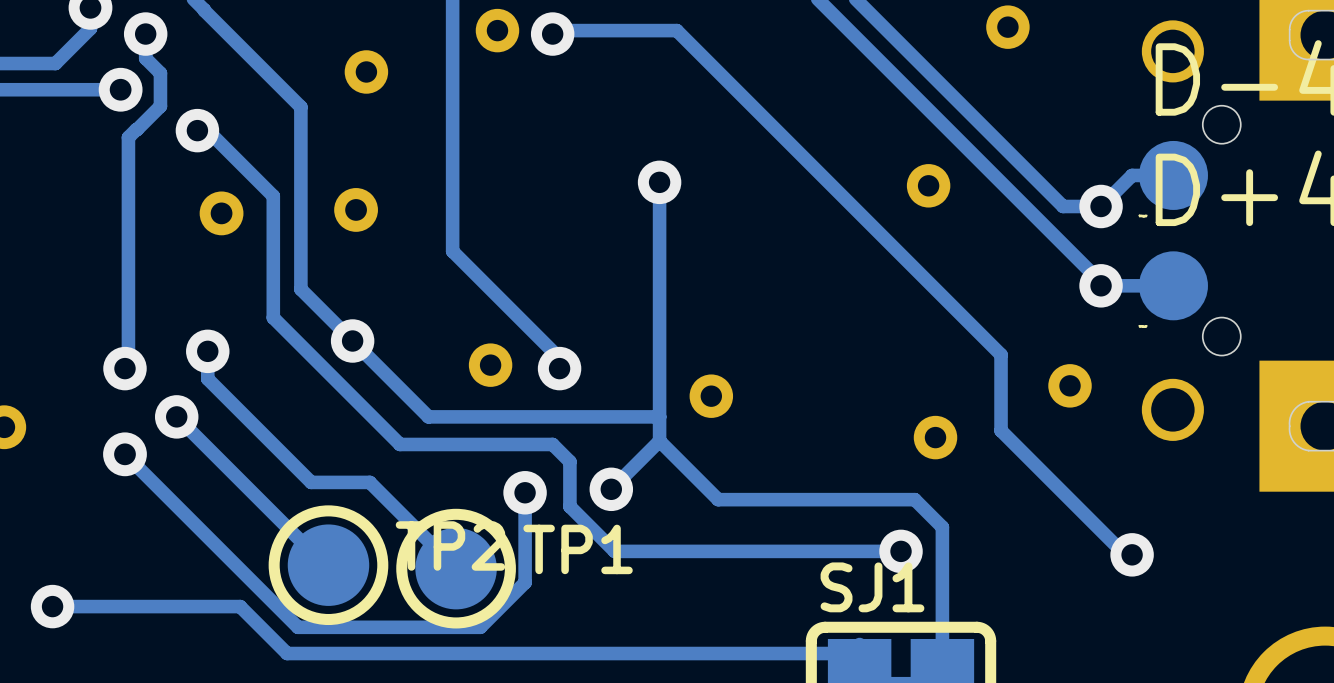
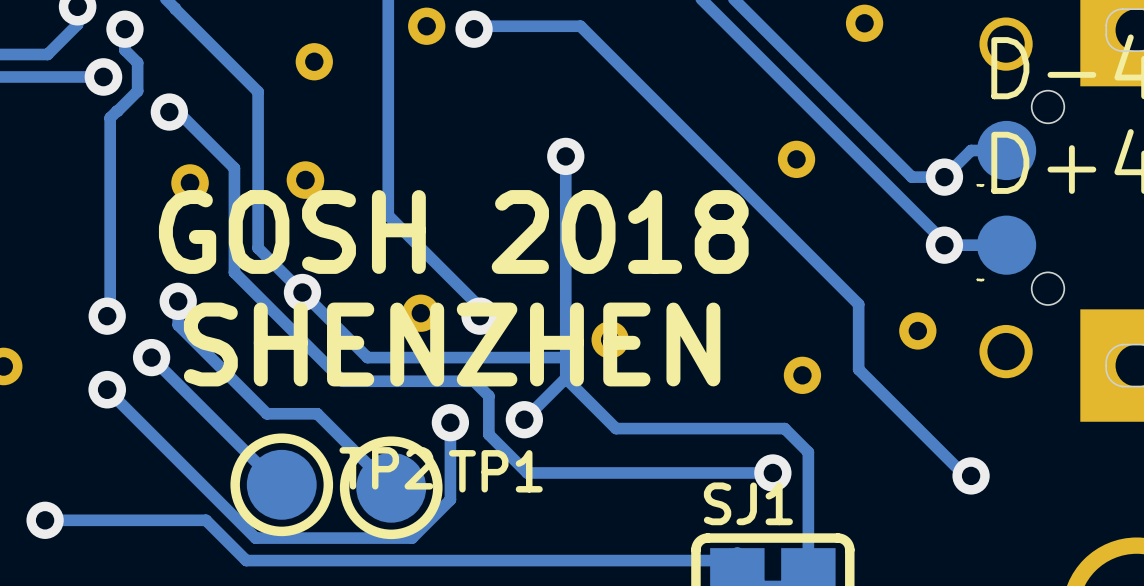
text: none -> GOSH 2018 (453, 231)
text: none -> SHENZHEN (452, 344)

